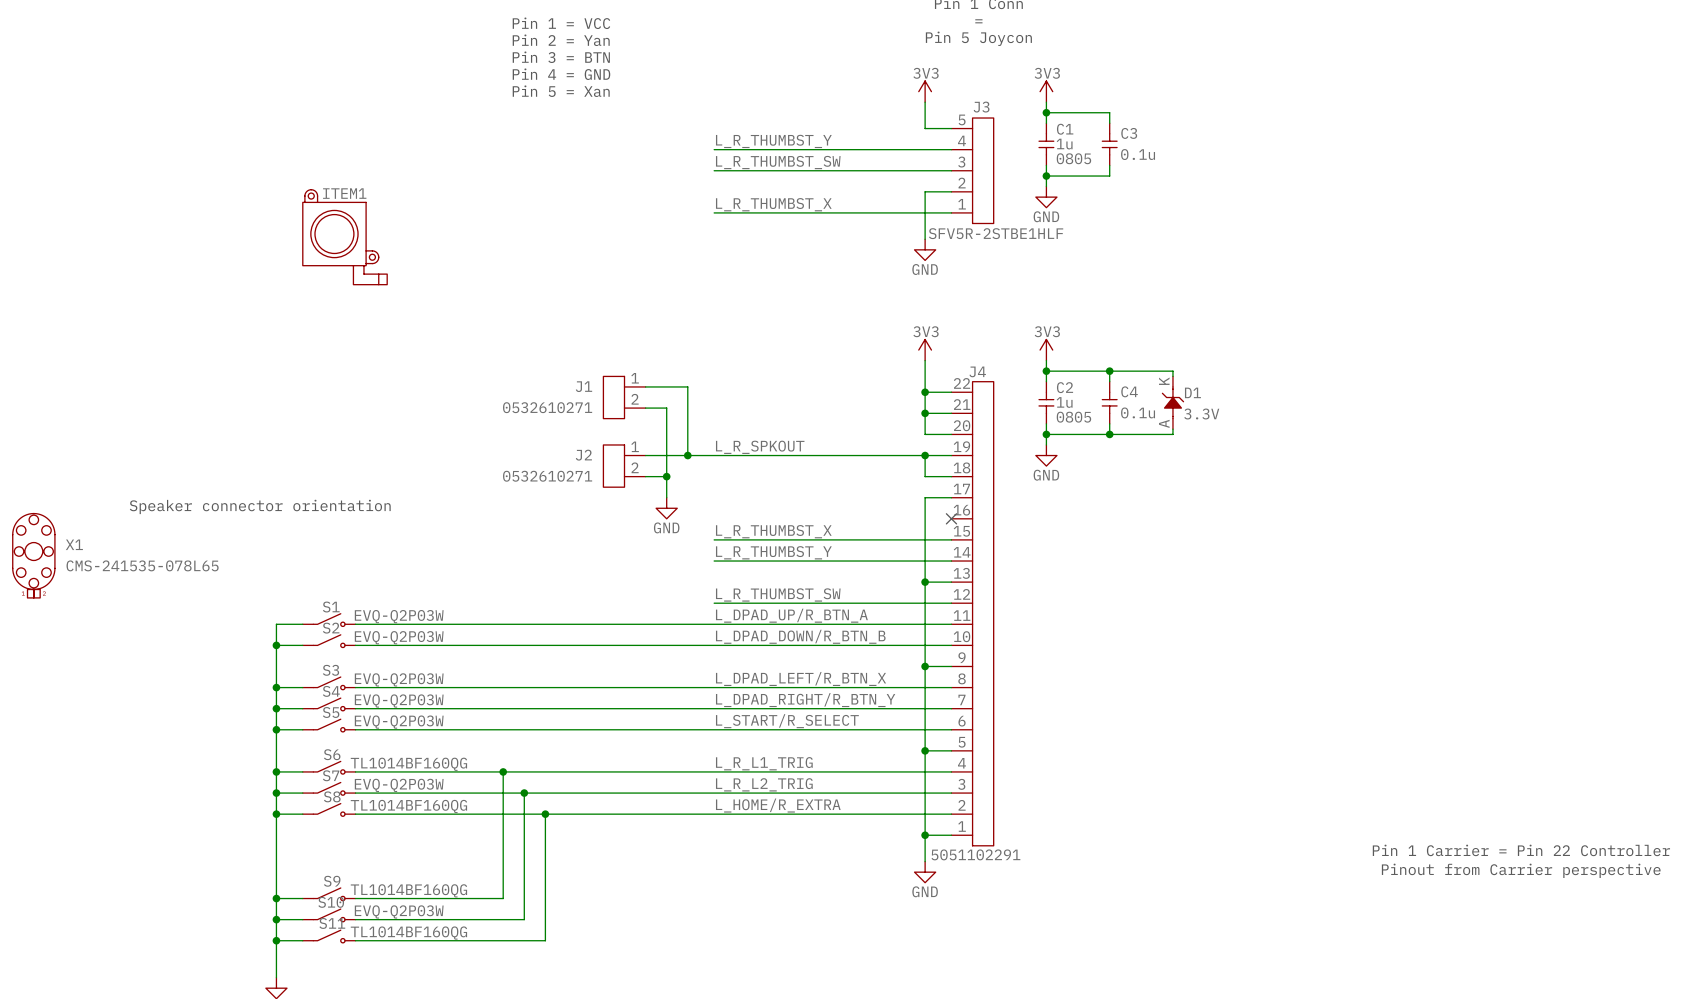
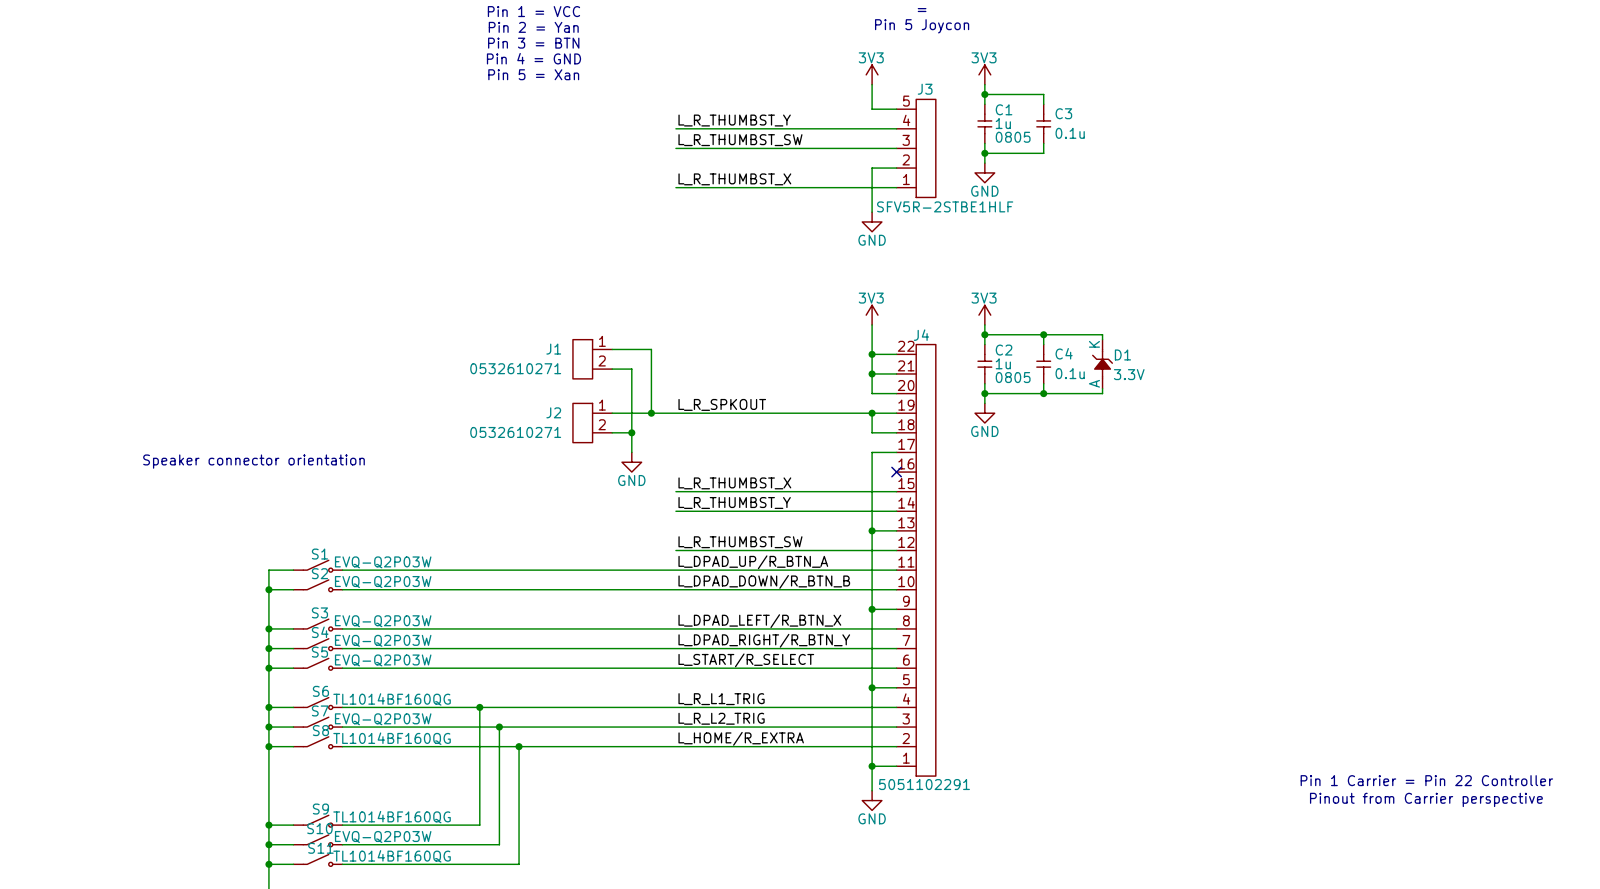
ITEM1: (344, 237) -> none
X1: CMS-241535-078L65 (33, 555) -> none

